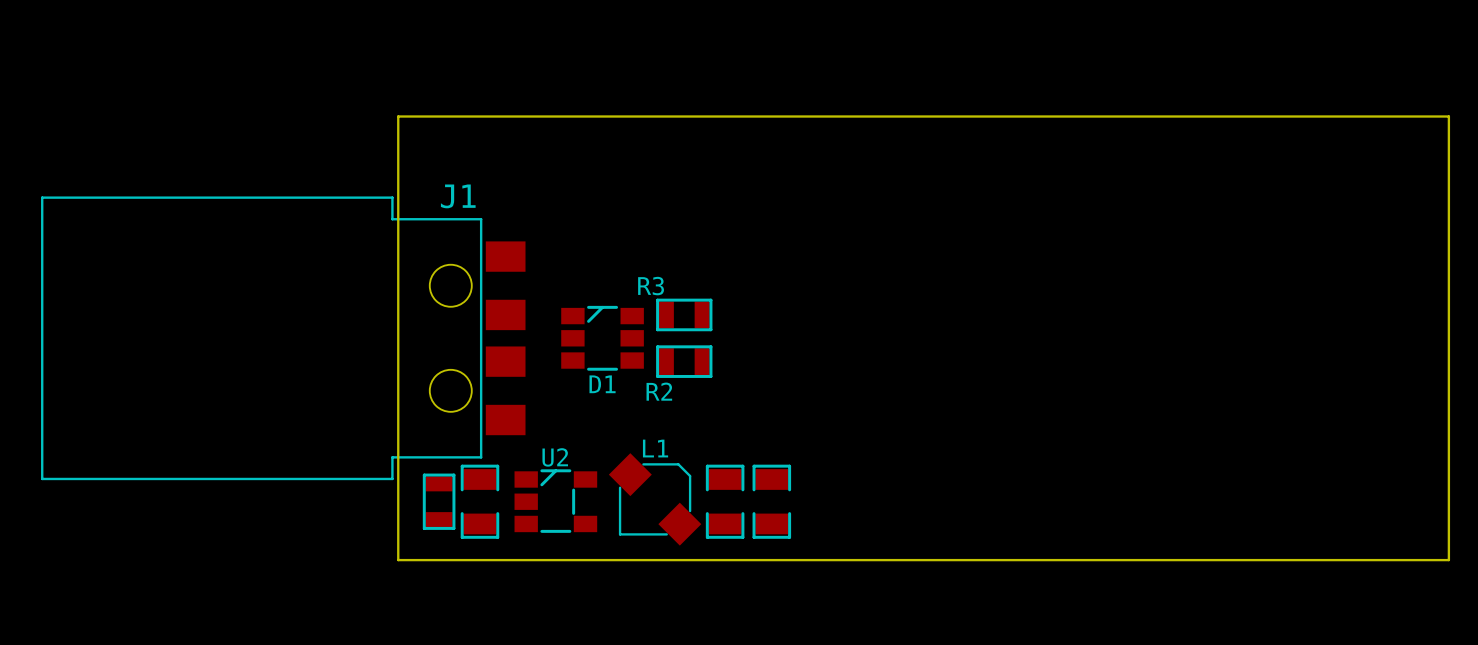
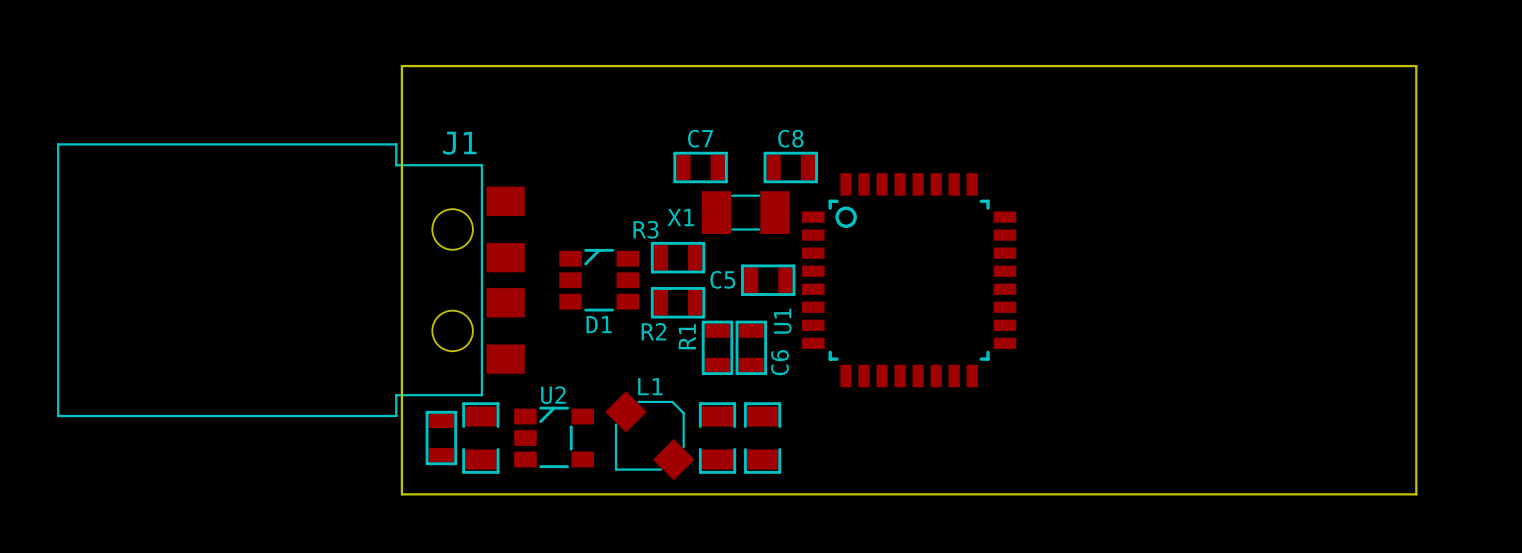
C7: none -> (700, 167)
C8: none -> (790, 167)
X1: none -> (745, 212)
C5: none -> (768, 280)
U1: none -> (909, 280)
R1: none -> (717, 347)
C6: none -> (751, 347)

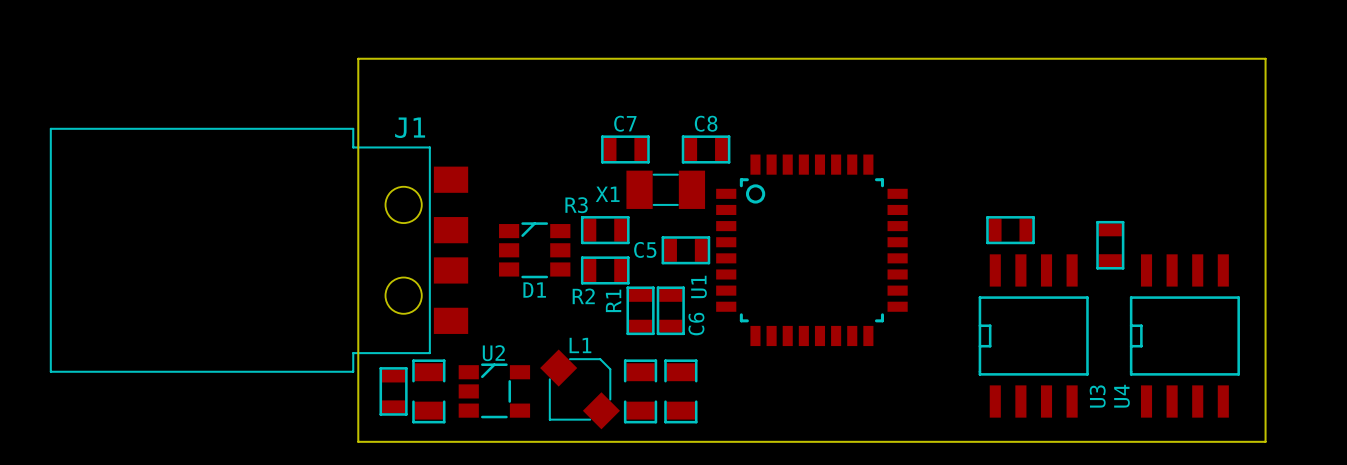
part: none -> (1010, 230)
part: none -> (1110, 245)
U3: none -> (1033, 335)
U4: none -> (1184, 335)

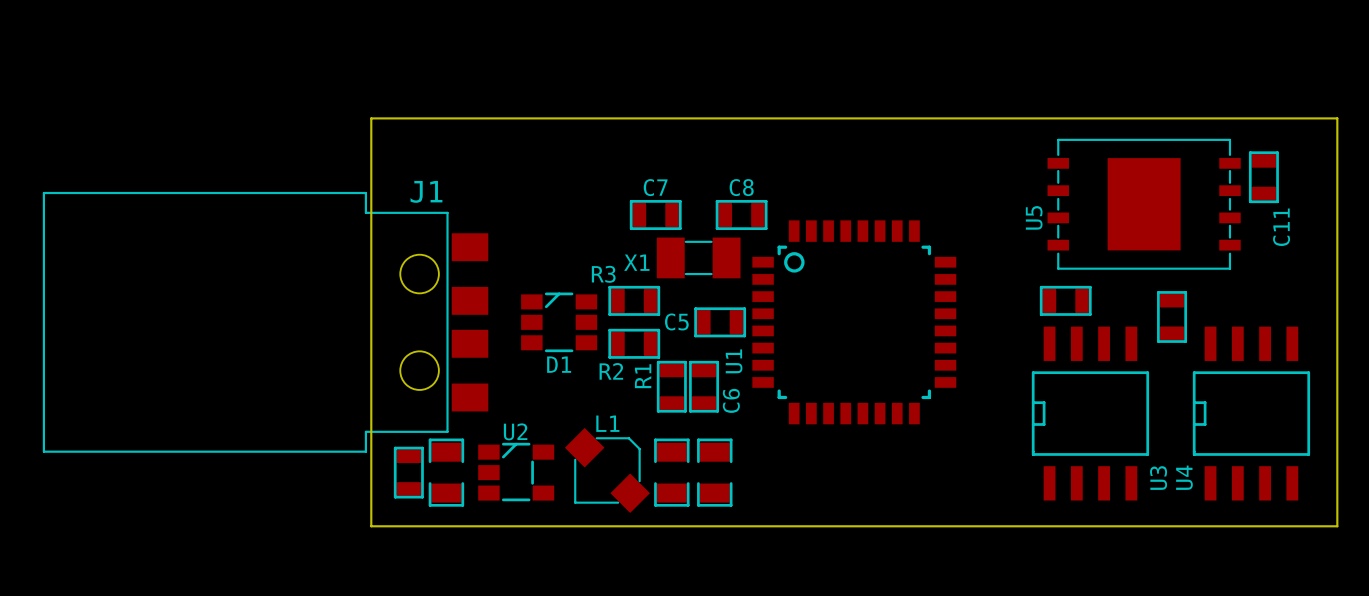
C11: none -> (1263, 177)
U5: none -> (1144, 204)

